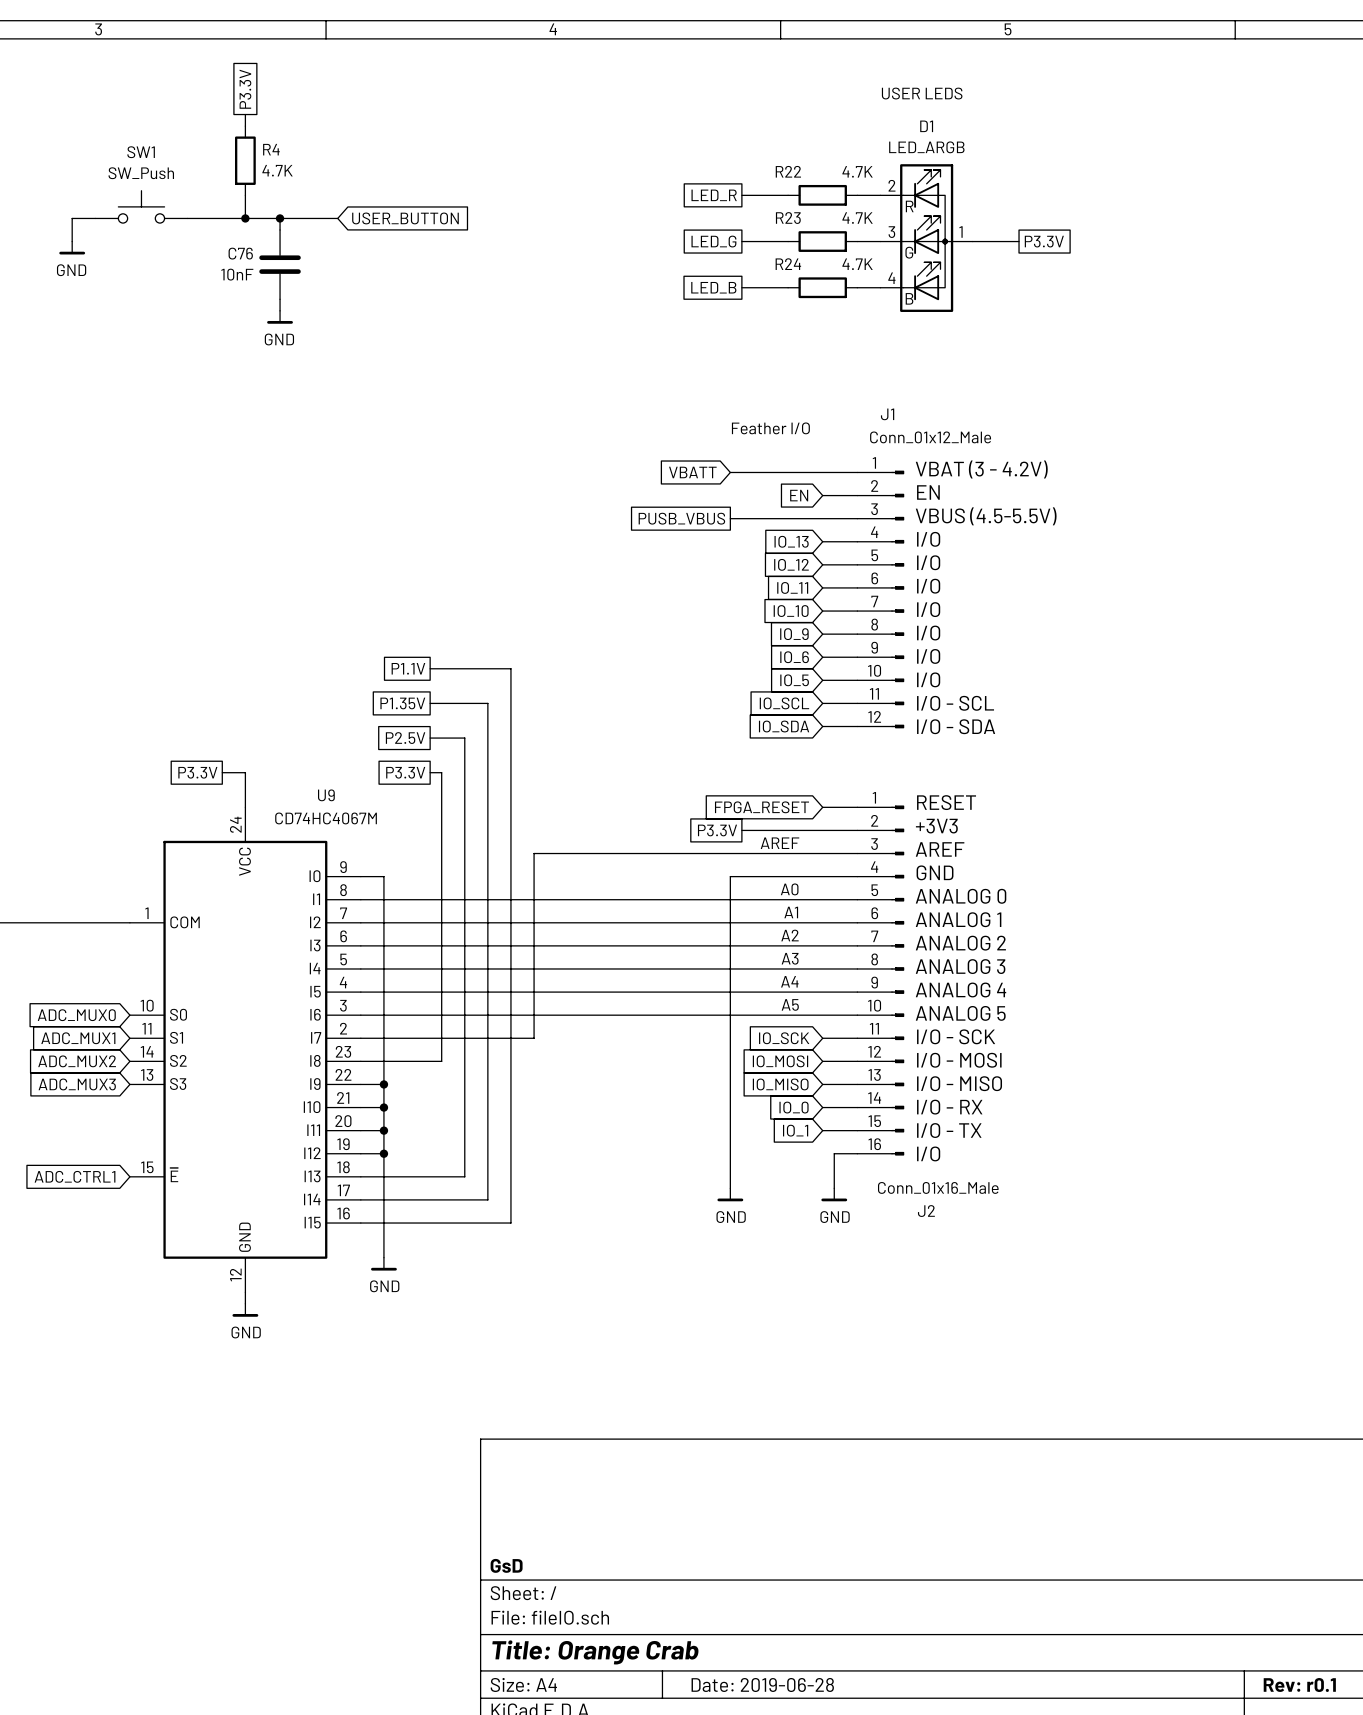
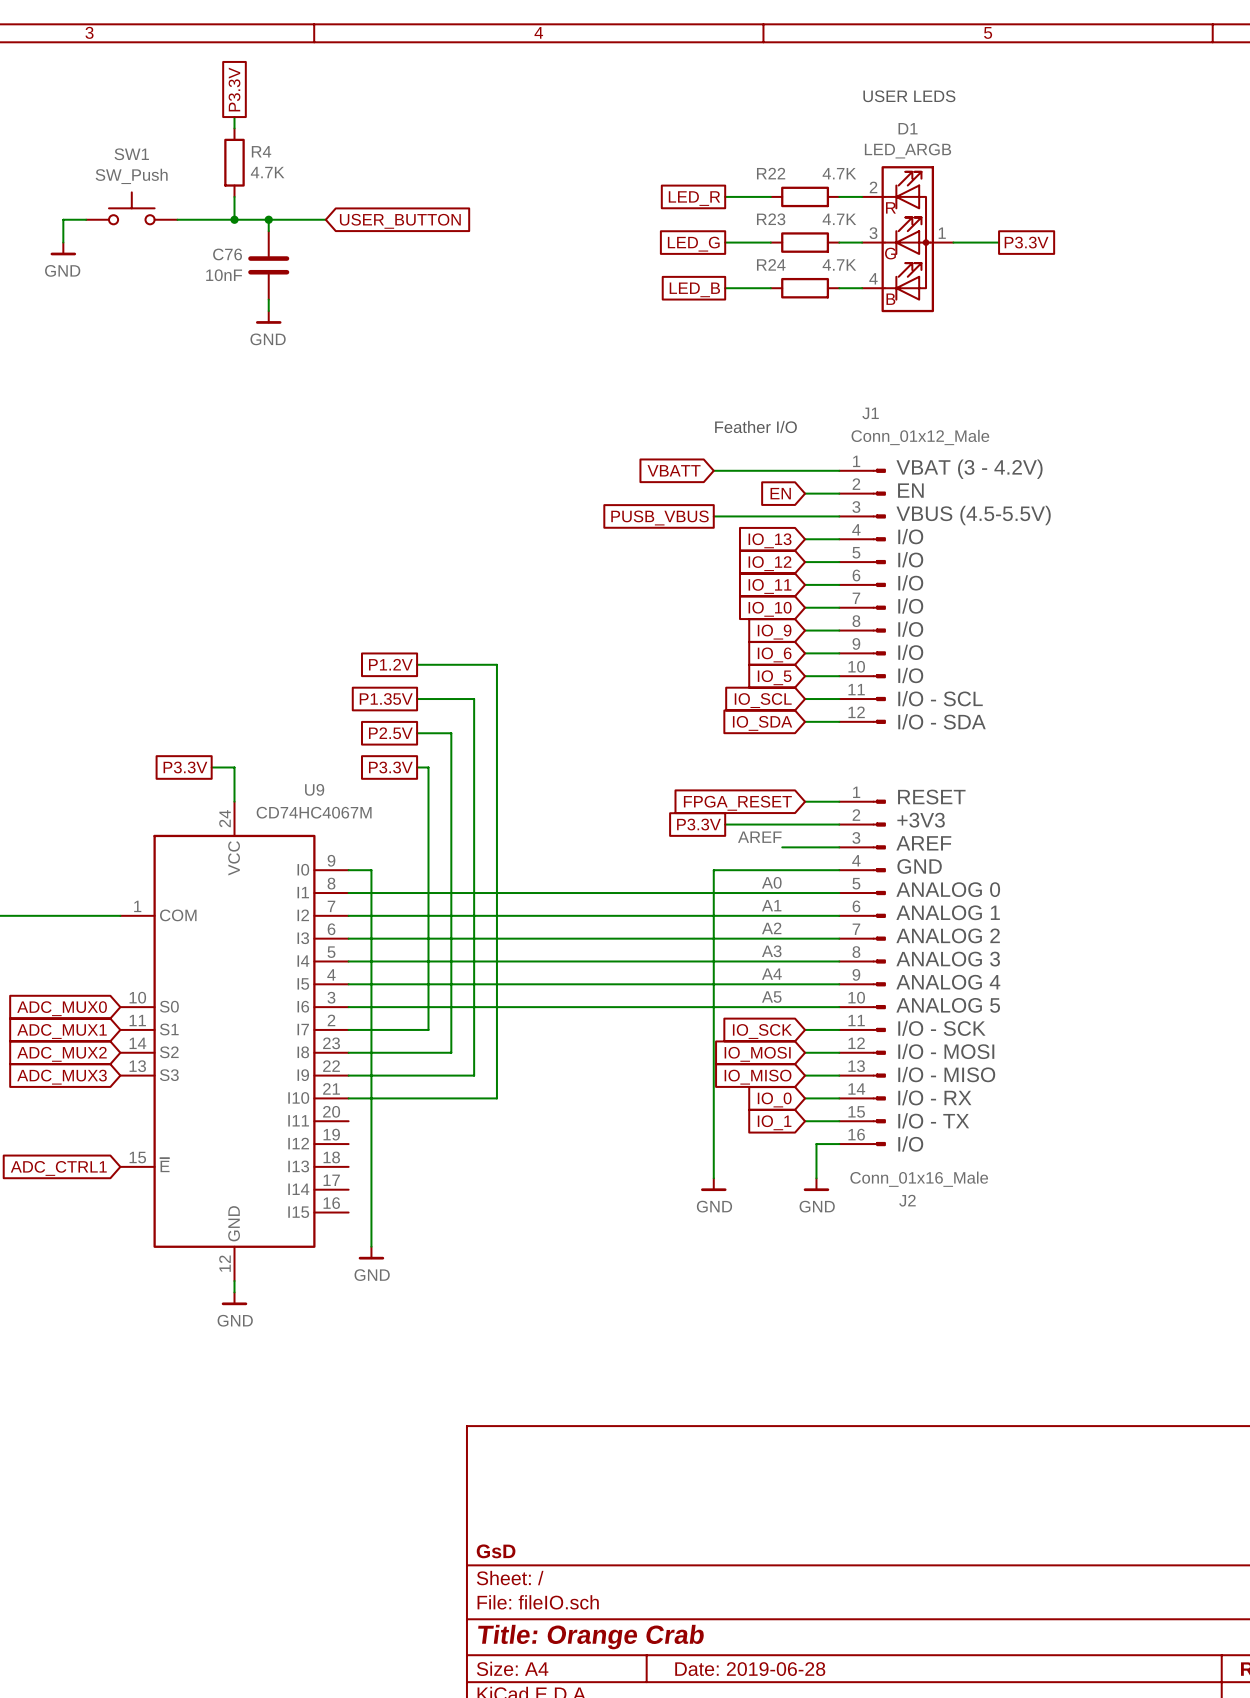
global label: P1.1V (408, 668) -> P1.2V (390, 664)
wire: (799, 853) (534, 853) (534, 1038) (441, 1038) (441, 1061) -> none
wire: (464, 1061) (464, 1176) (360, 1176) -> (451, 1052) (428, 1052)
junction: (383, 1084) -> none
wire: (487, 1084) (487, 1199) (360, 1199) -> (474, 1075) (371, 1075)
junction: (383, 1107) -> none
wire: (510, 1107) (510, 1223) (360, 1223) -> (496, 1098) (371, 1098)
wire: (360, 1130) (383, 1130) -> none
junction: (383, 1130) -> none
wire: (360, 1153) (383, 1153) -> none
junction: (383, 1153) -> none

